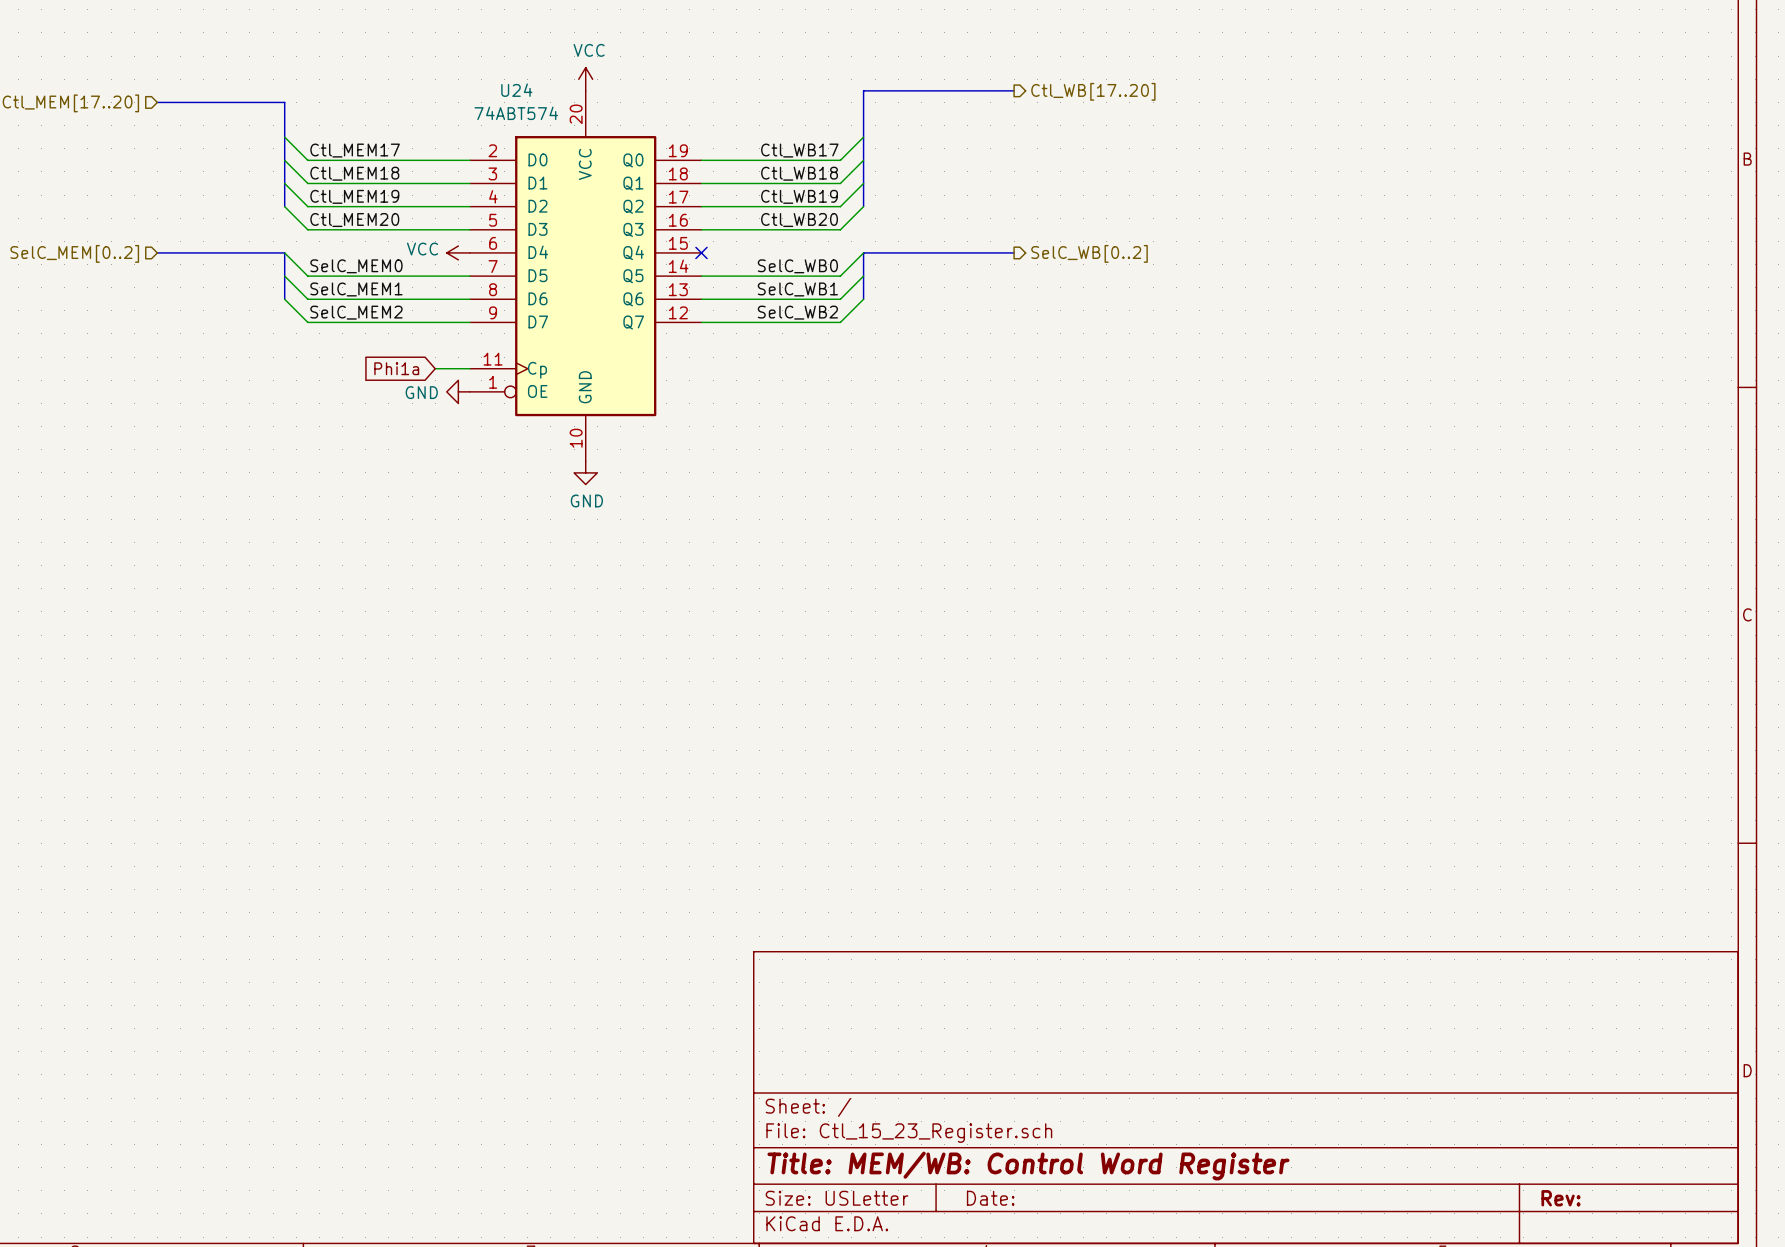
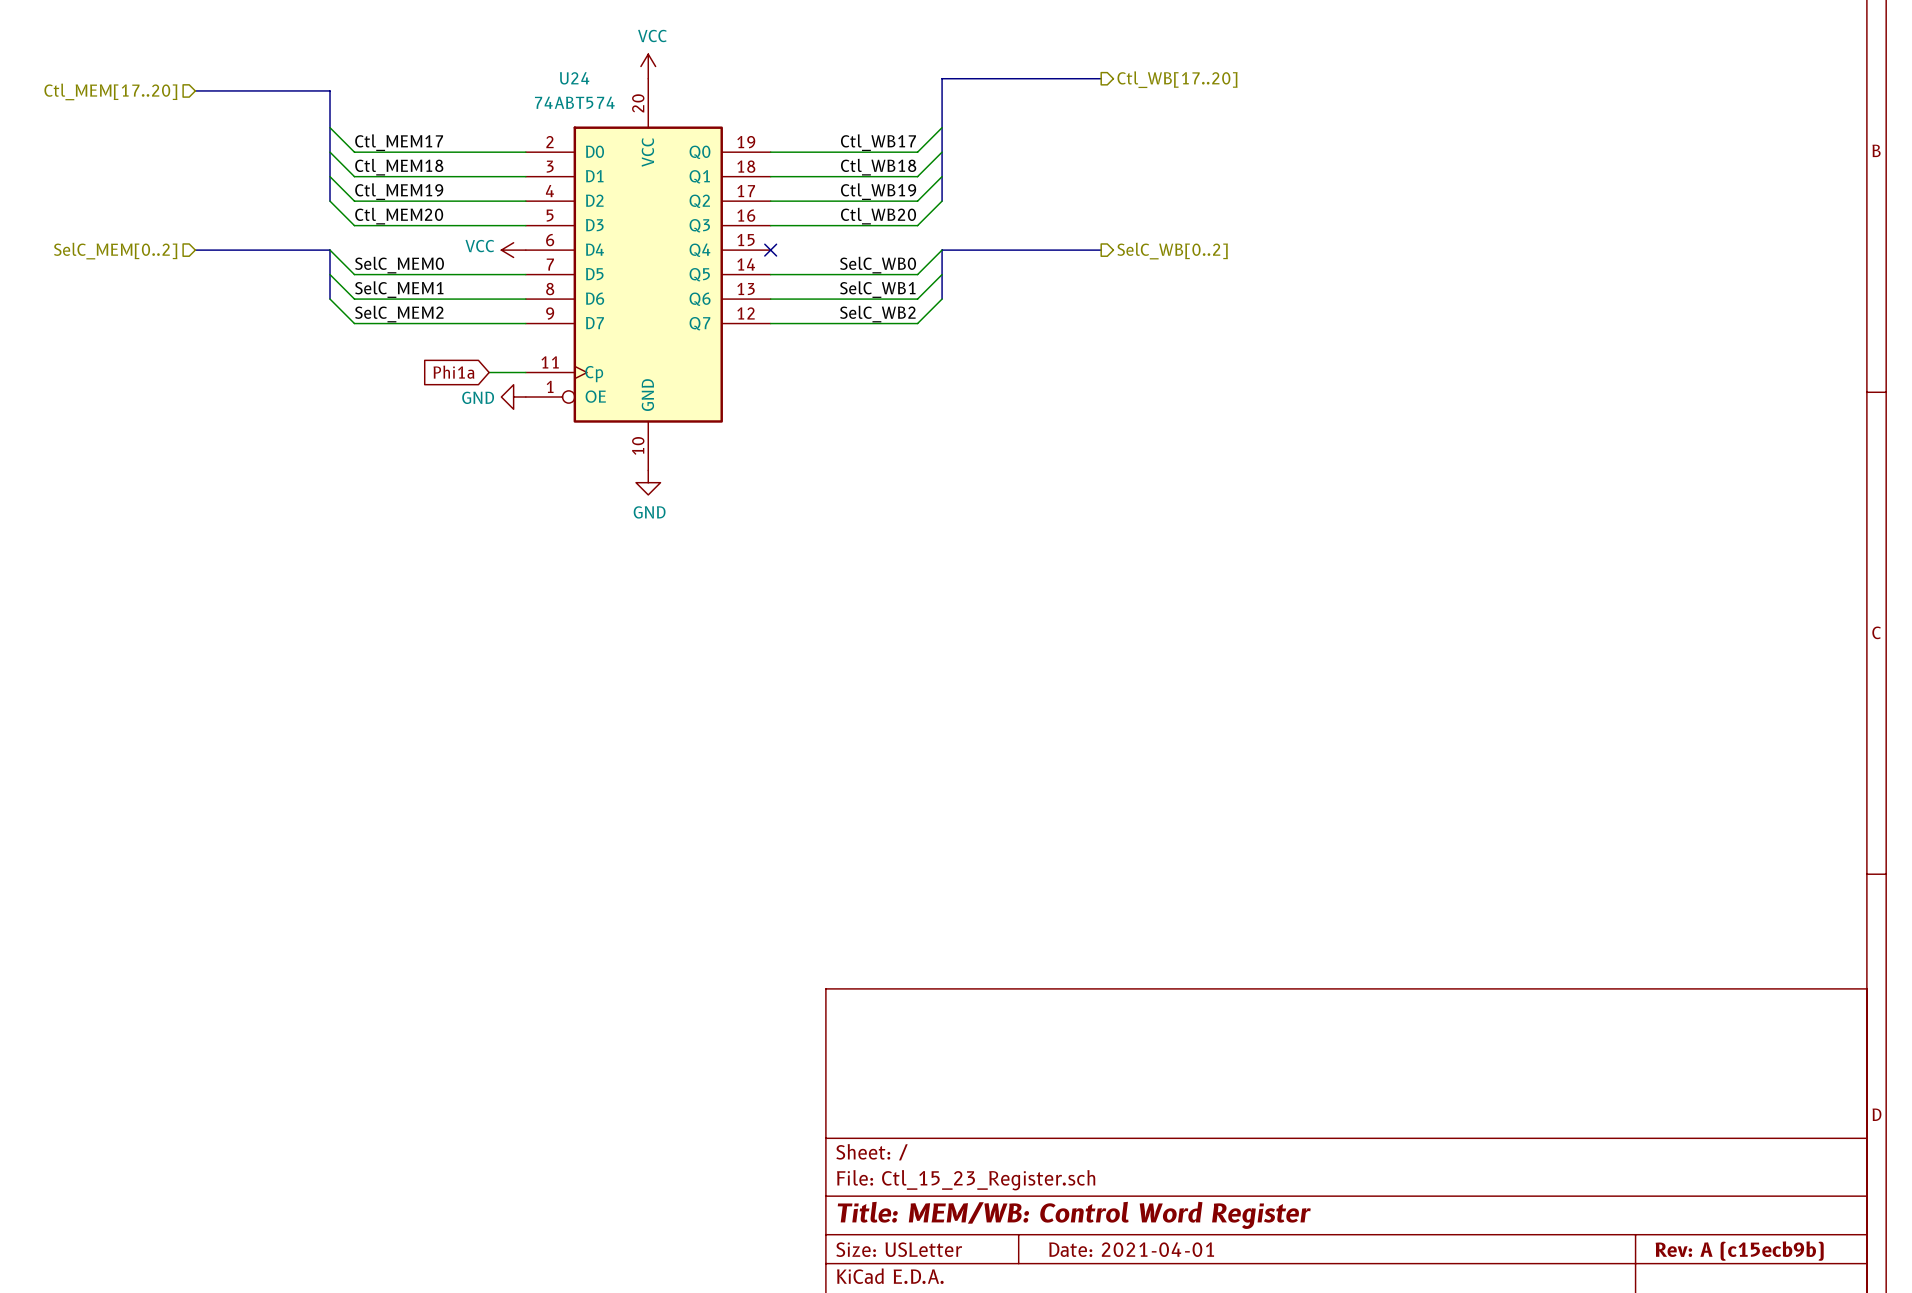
title block: Date: (990, 1198) -> Date: 2021-04-01 (1131, 1249)
title block: Rev: (1561, 1198) -> Rev: A (c15ecb9b) (1739, 1251)

